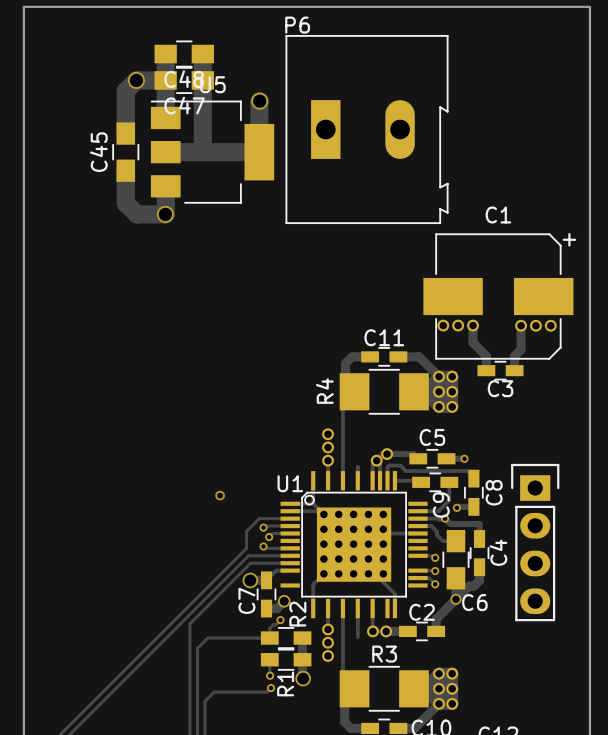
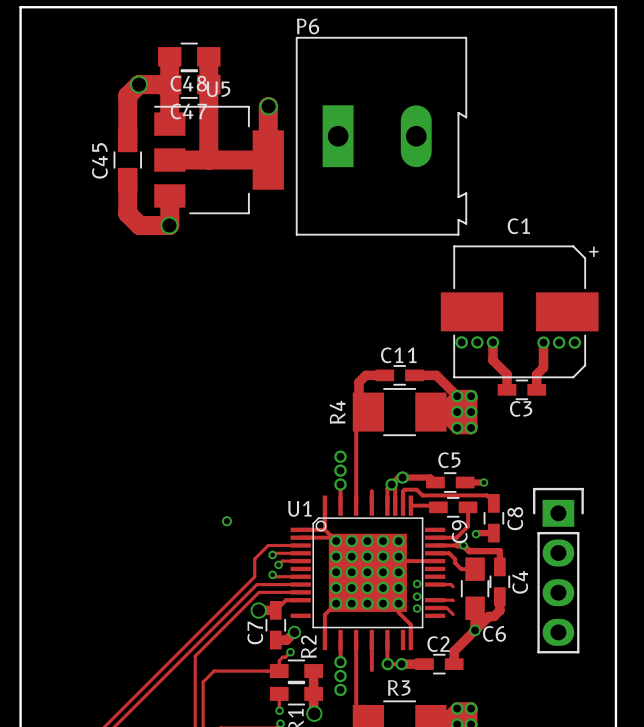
via: none -> (417, 583)
via: (435, 557) -> none
via: none -> (417, 596)
via: (435, 571) -> none
via: none -> (417, 608)
via: (435, 584) -> none

